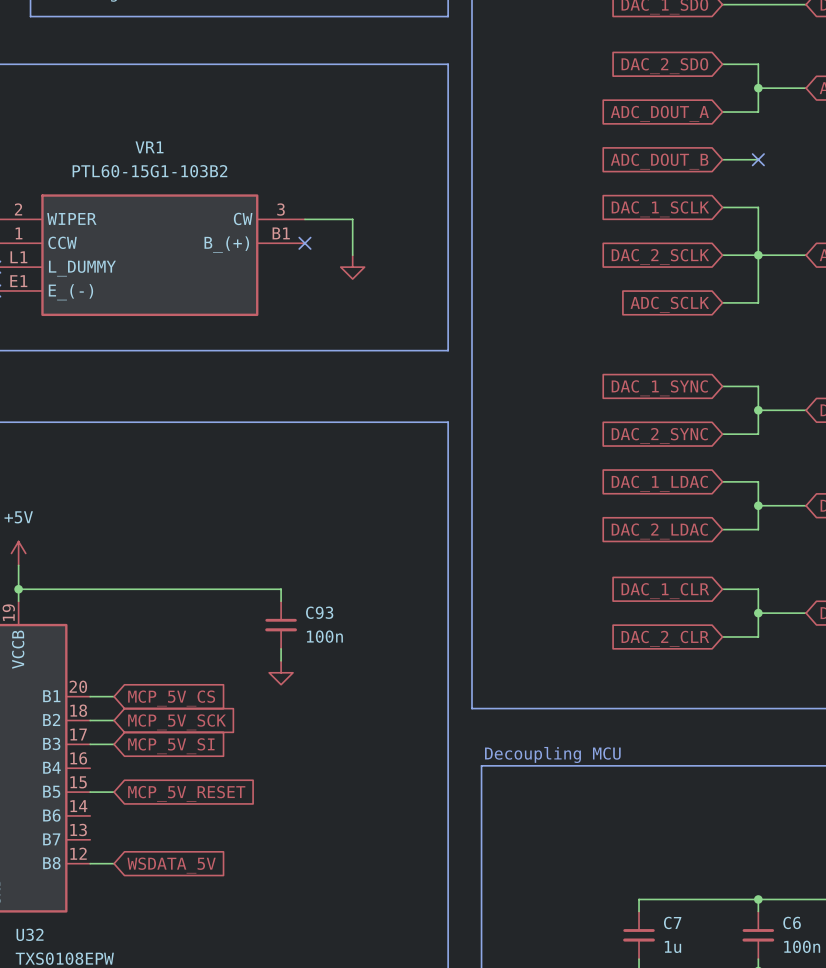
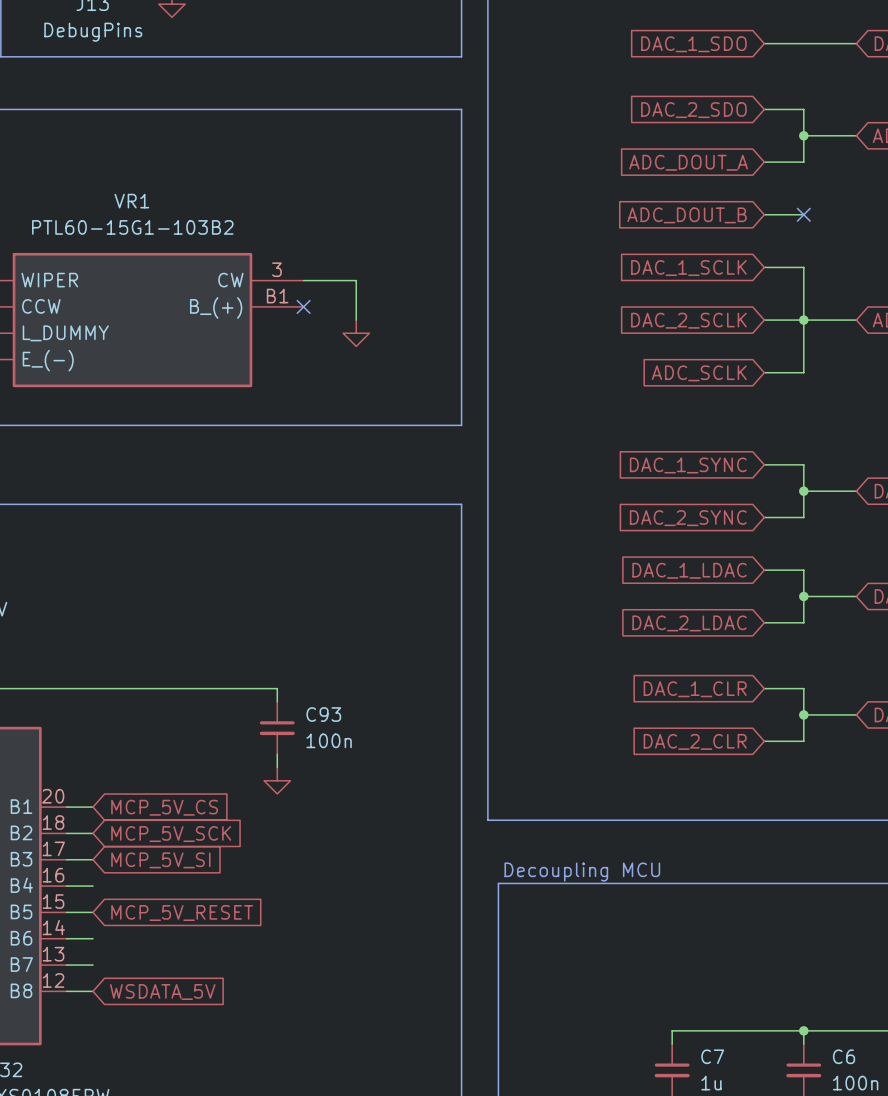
wire: none -> (66, 886) (93, 886)
wire: none -> (66, 938) (93, 938)
wire: none -> (66, 965) (93, 965)

